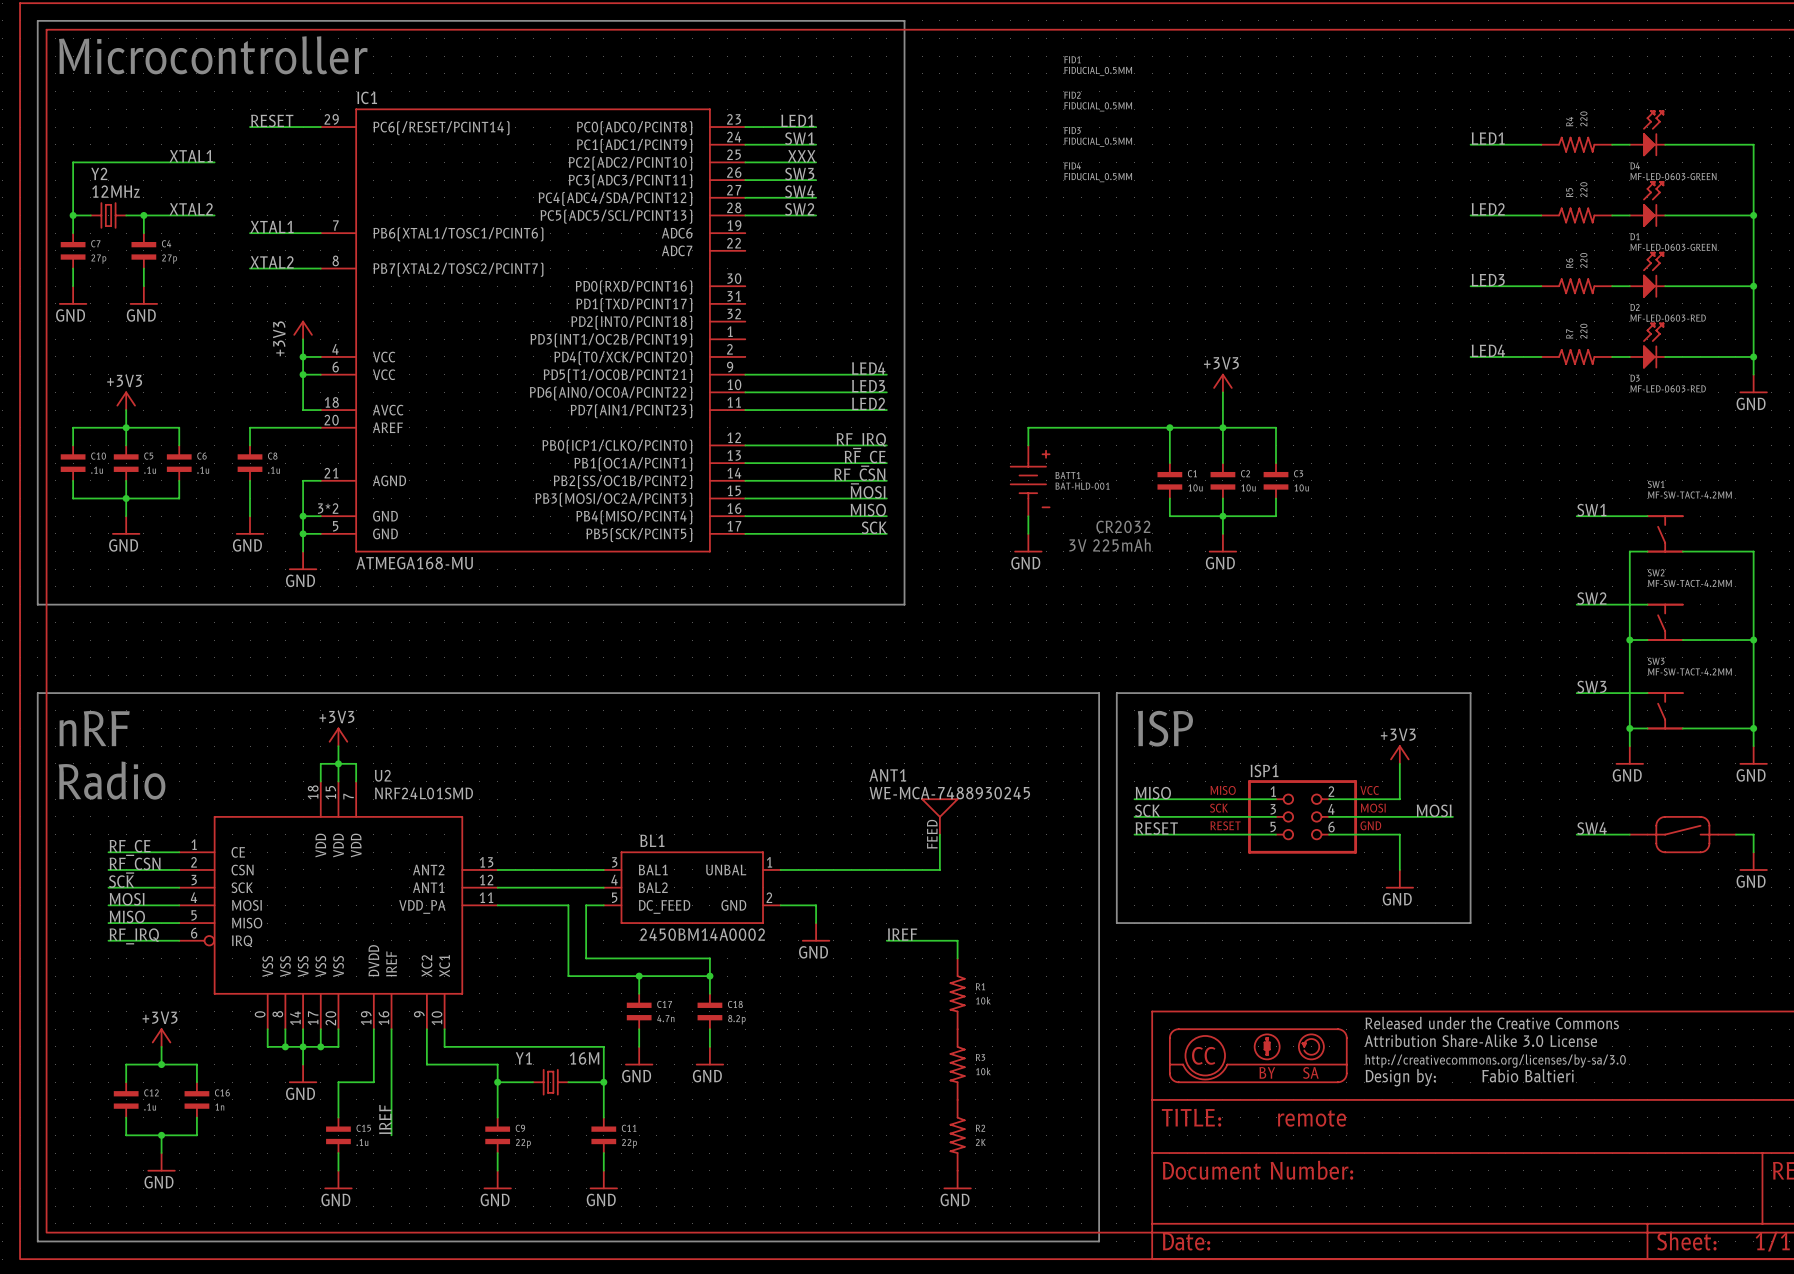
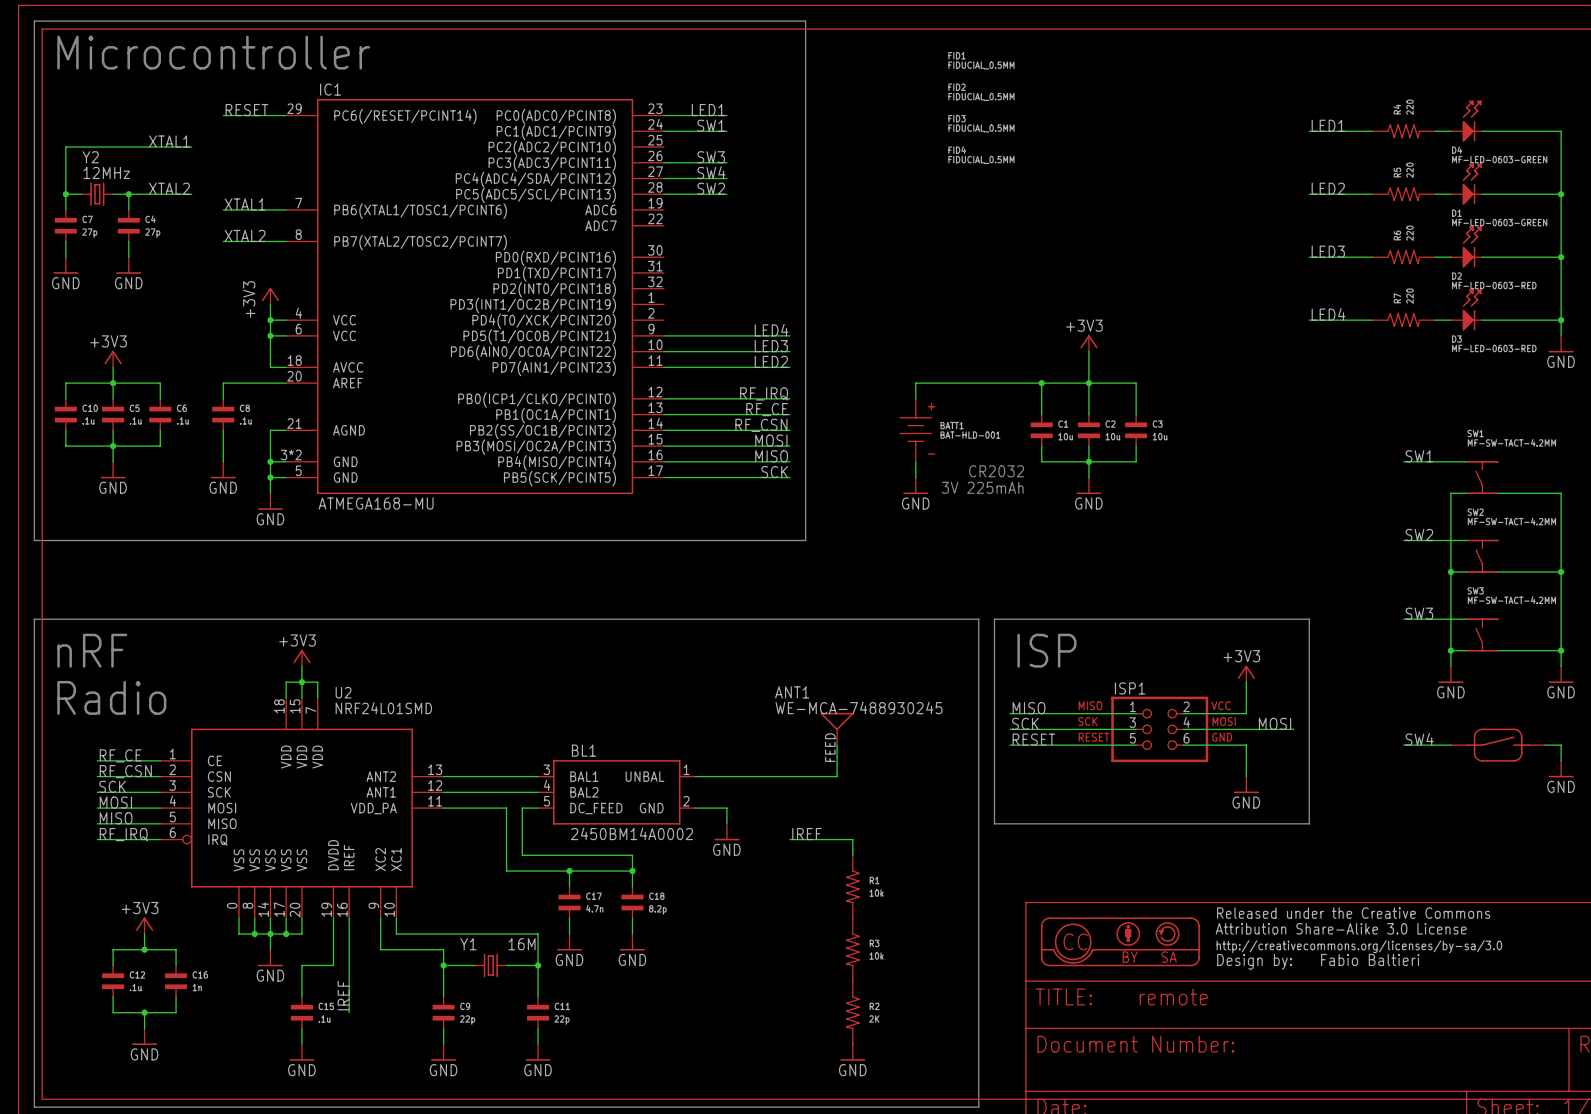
label: XXX (801, 156) -> none
wire: (745, 162) (816, 162) -> none

